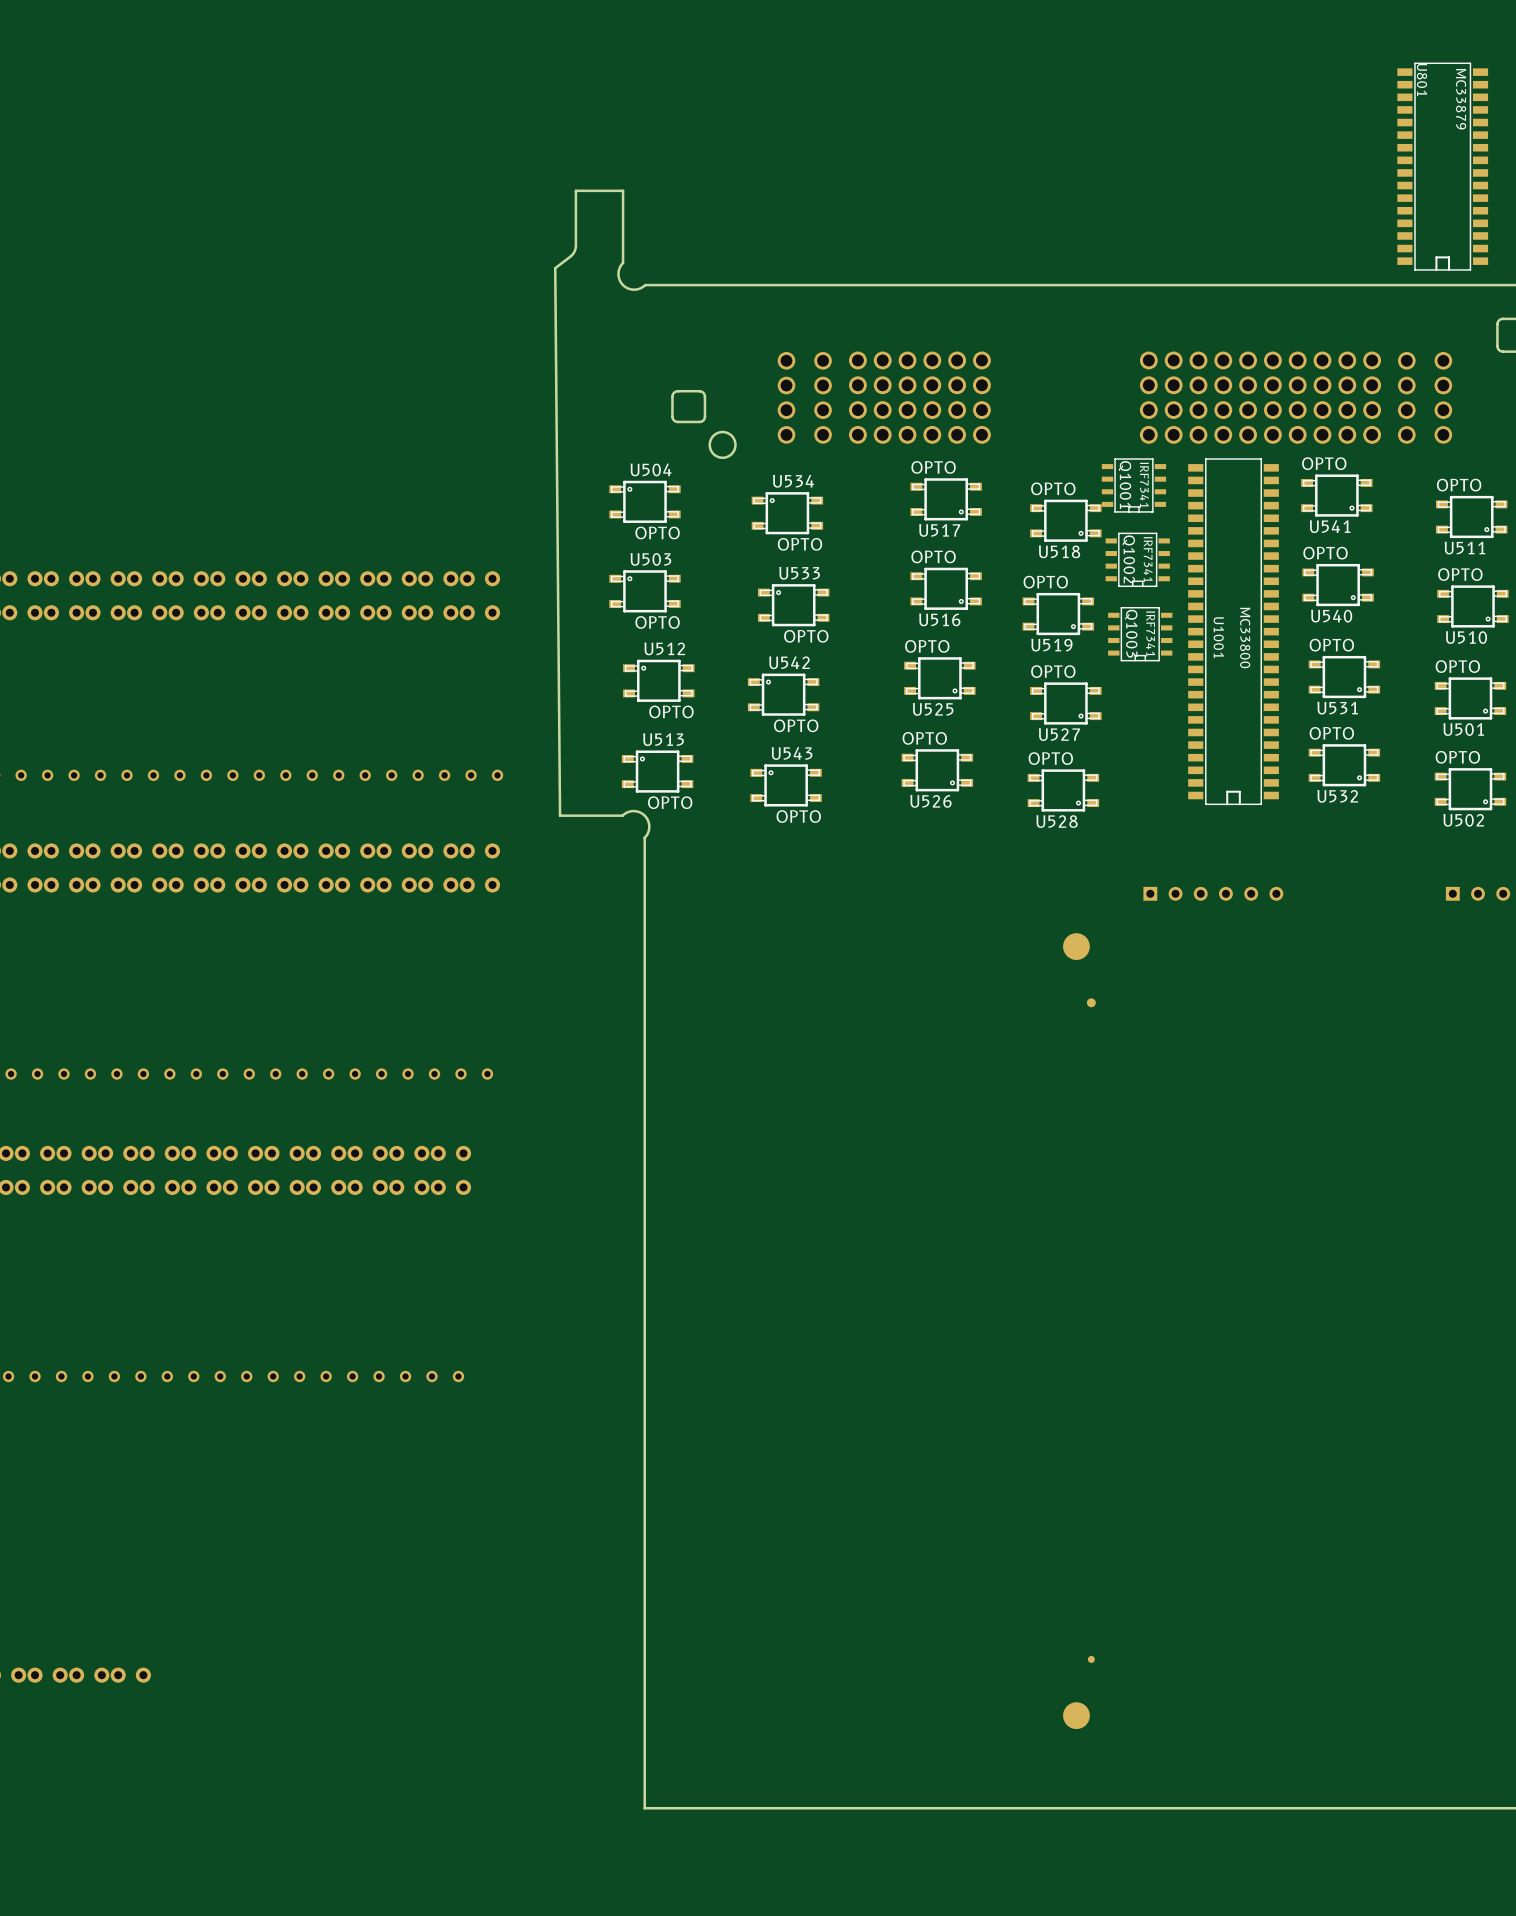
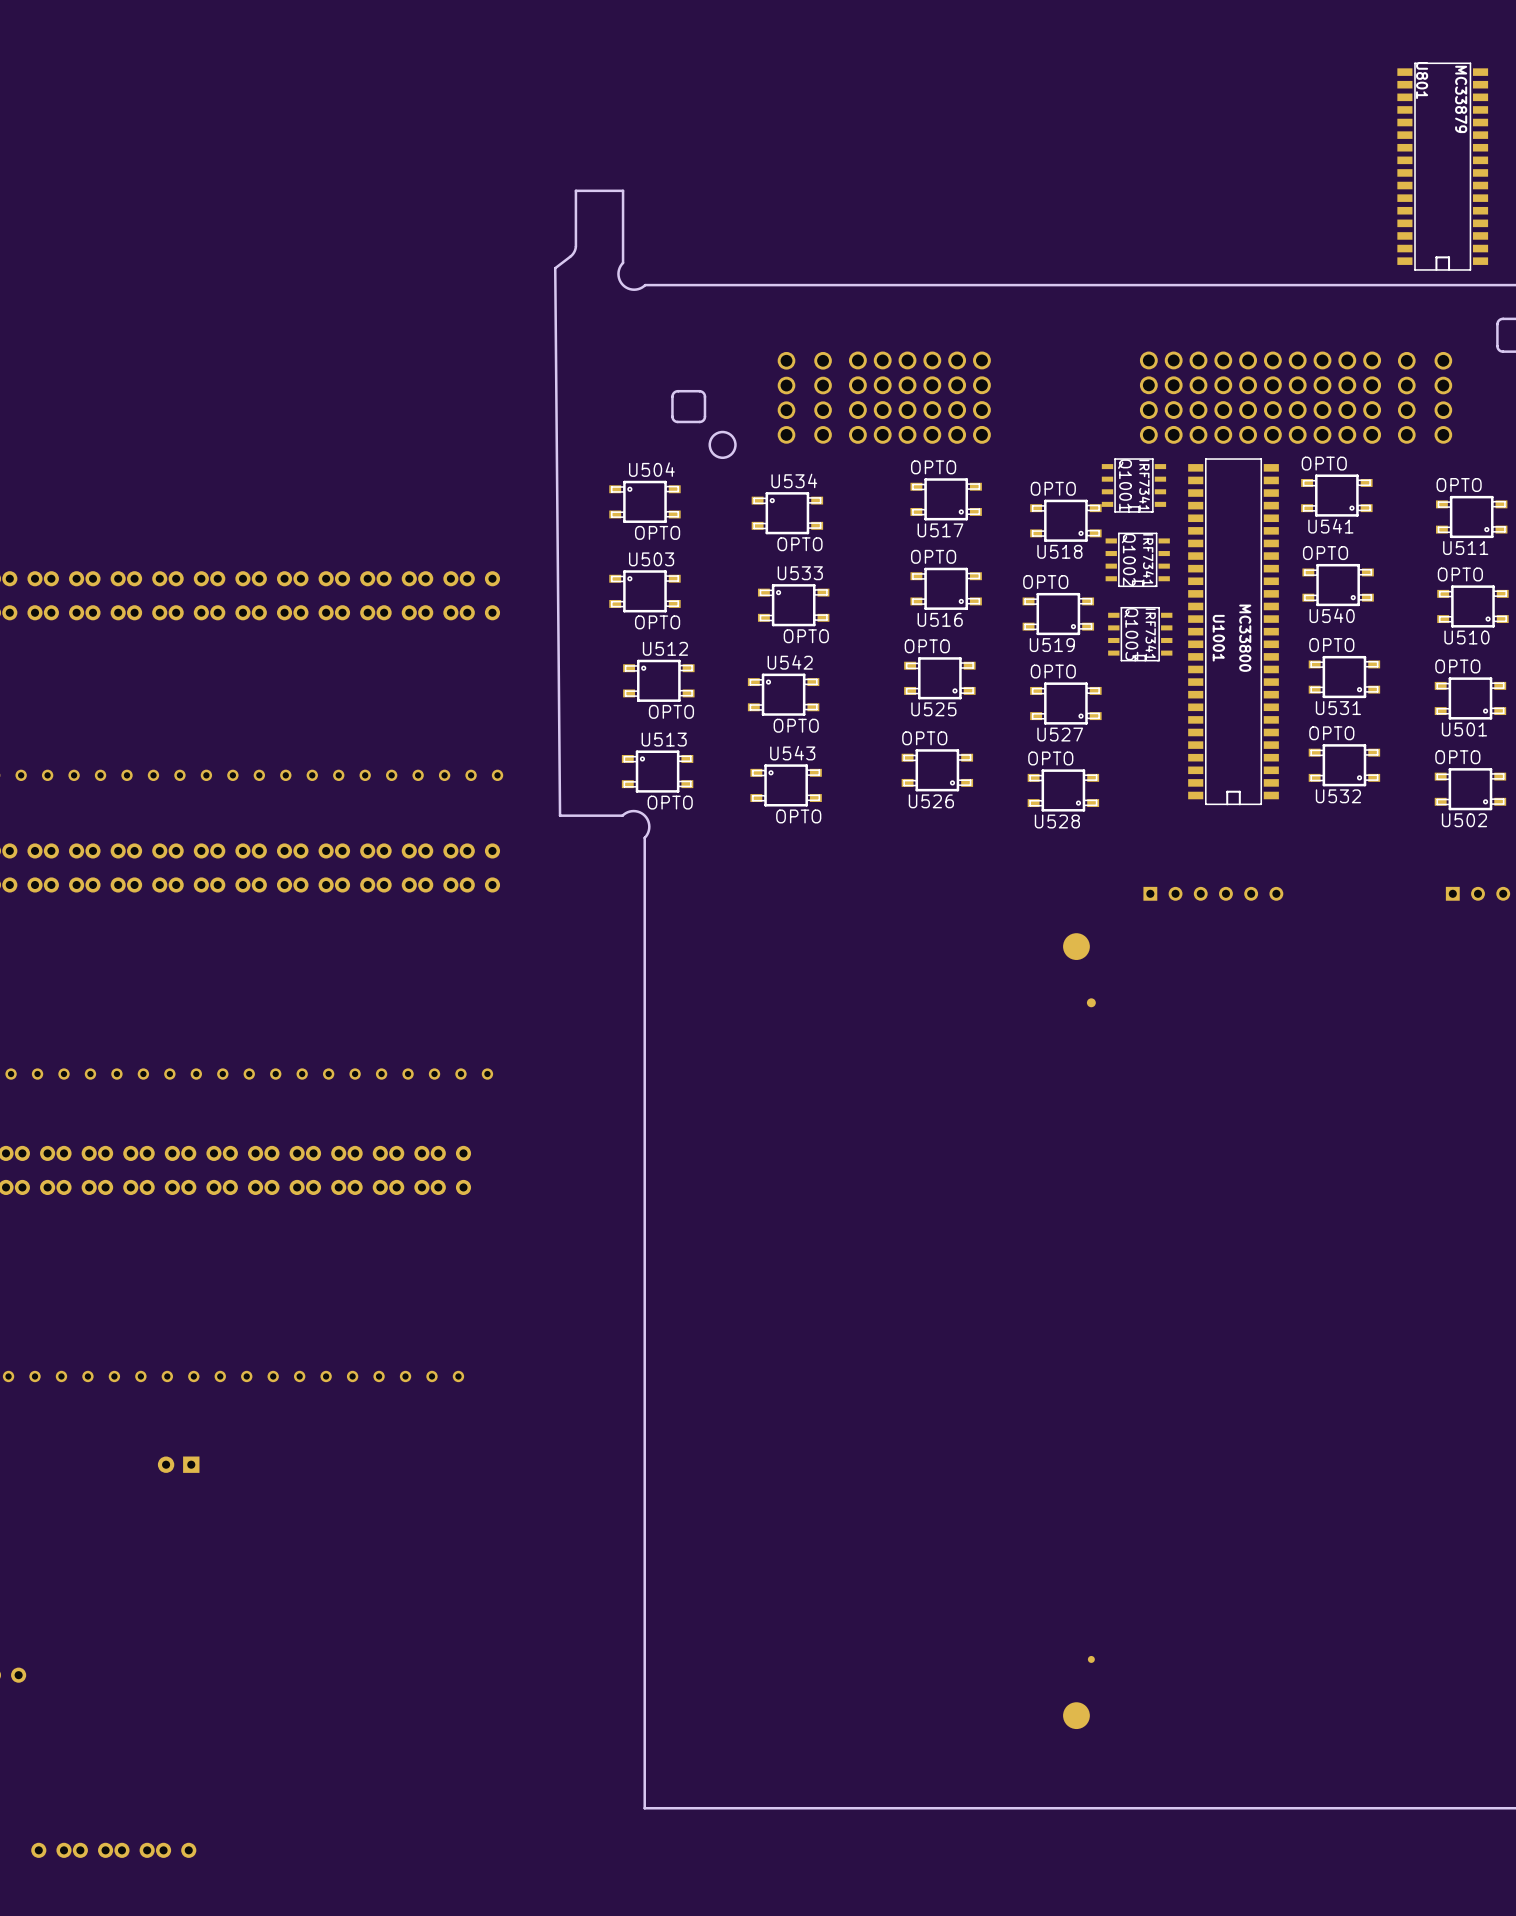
part: none -> (178, 1464)
part: (47, 1675) -> none
part: (89, 1675) -> none
part: (130, 1675) -> none
part: none -> (51, 1850)
part: none -> (92, 1850)
part: none -> (134, 1850)
part: none -> (176, 1850)

